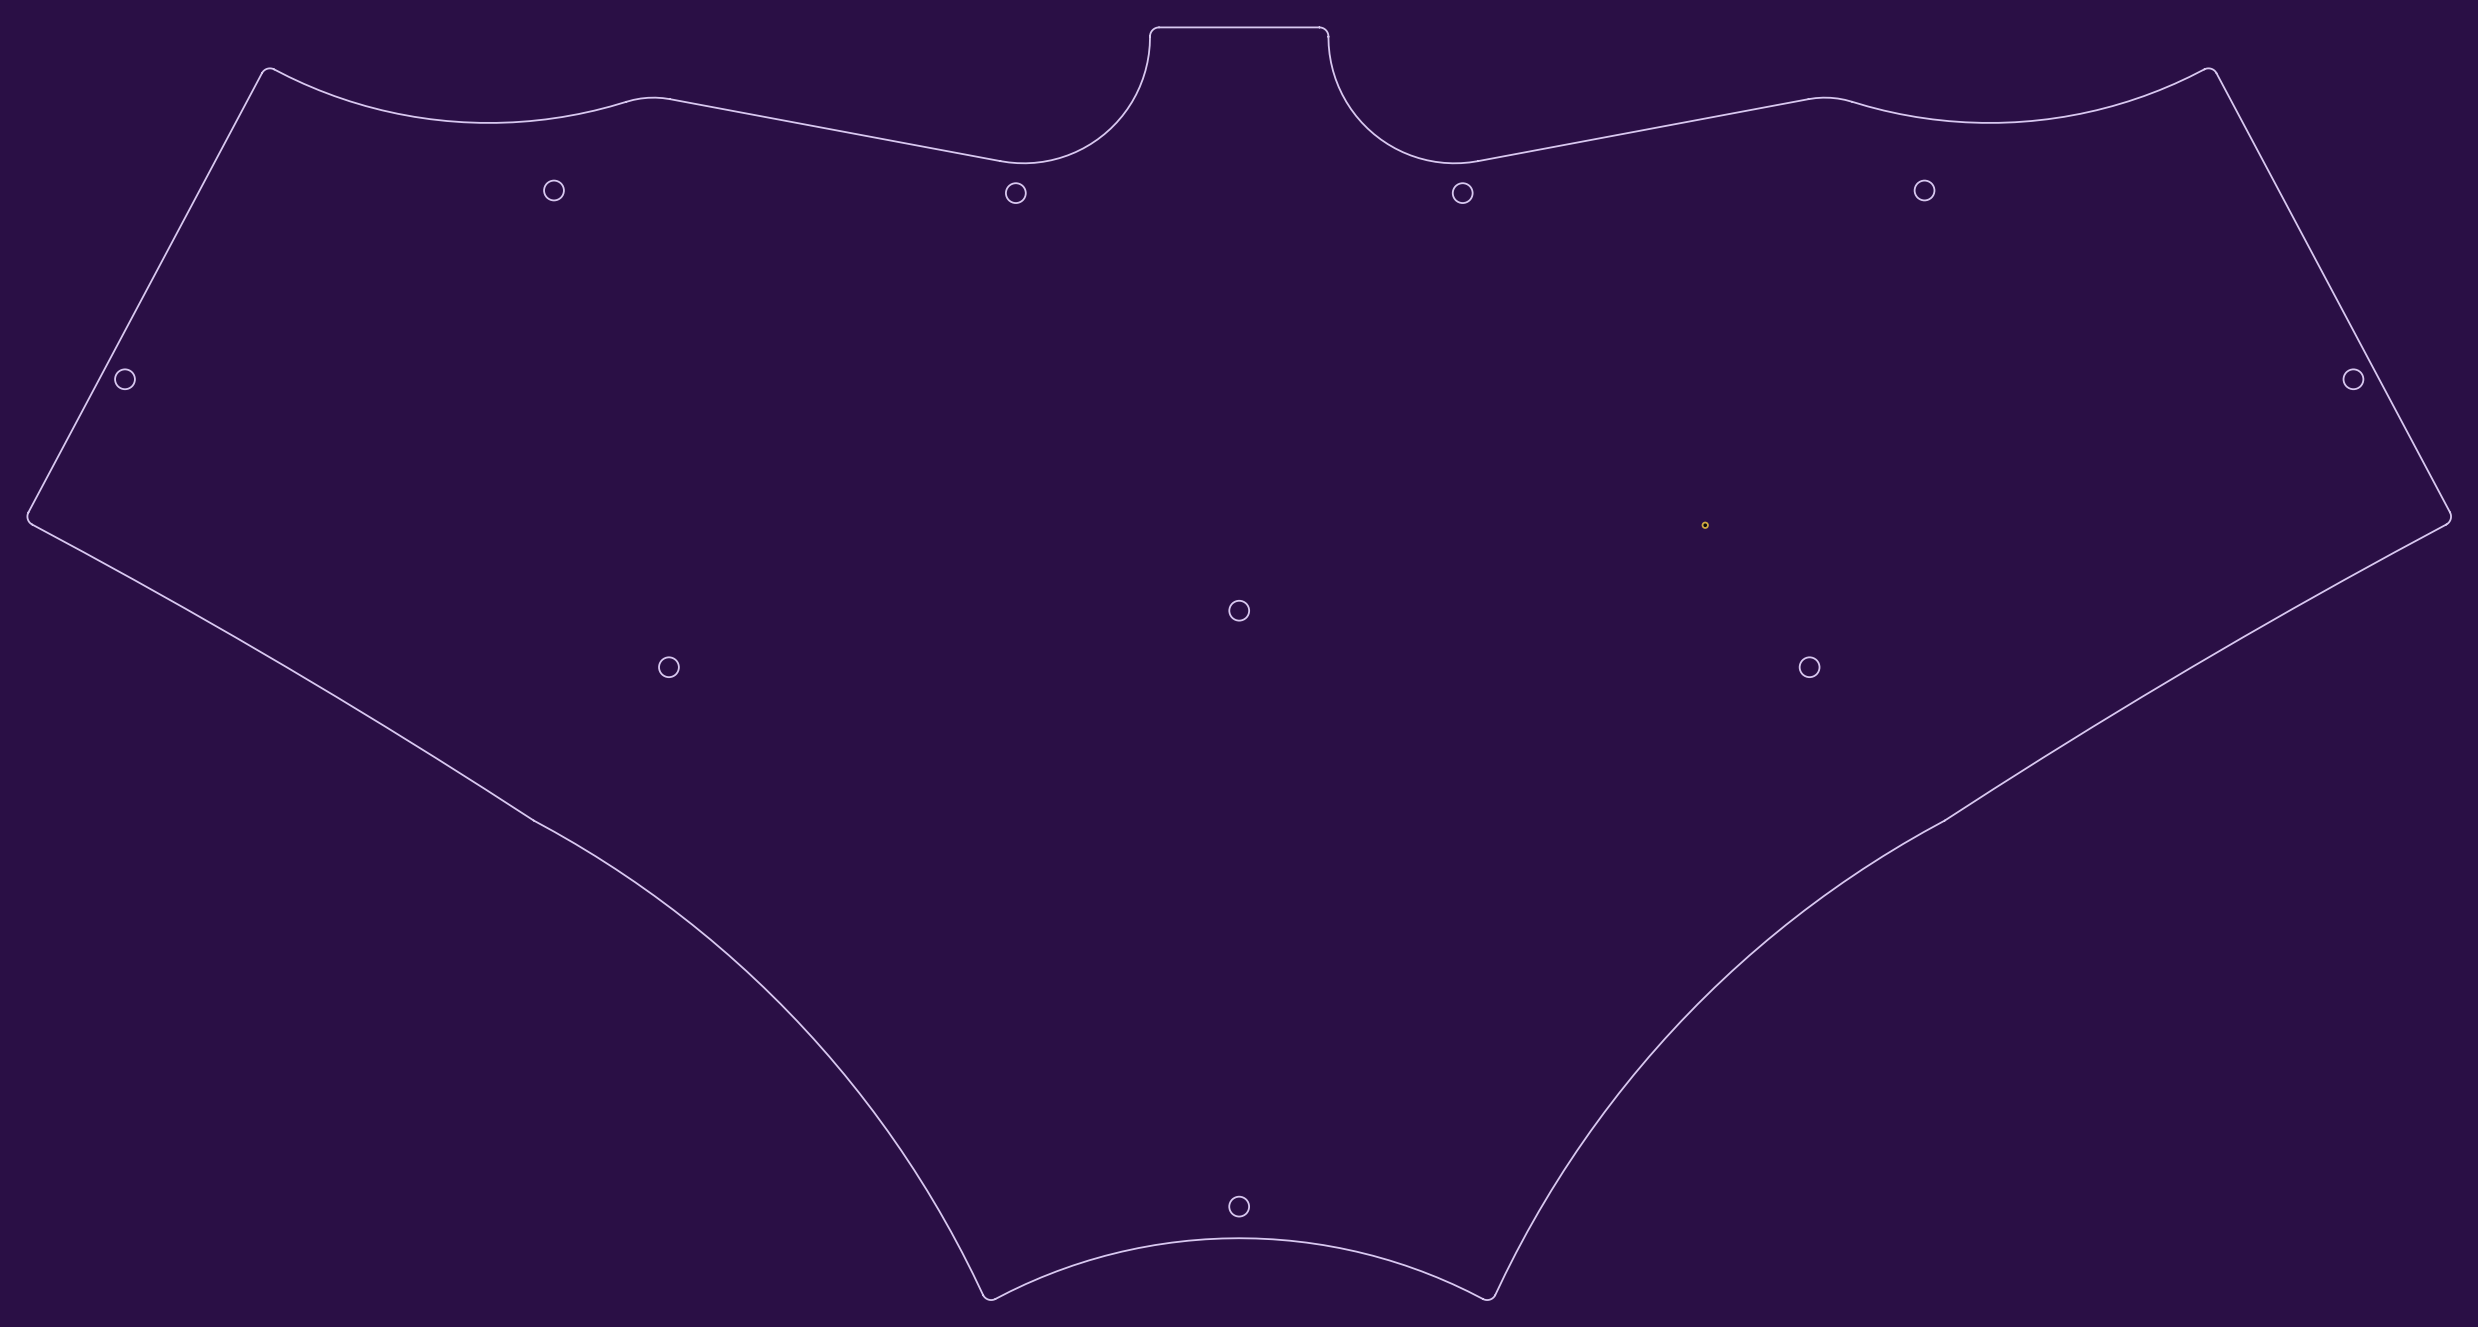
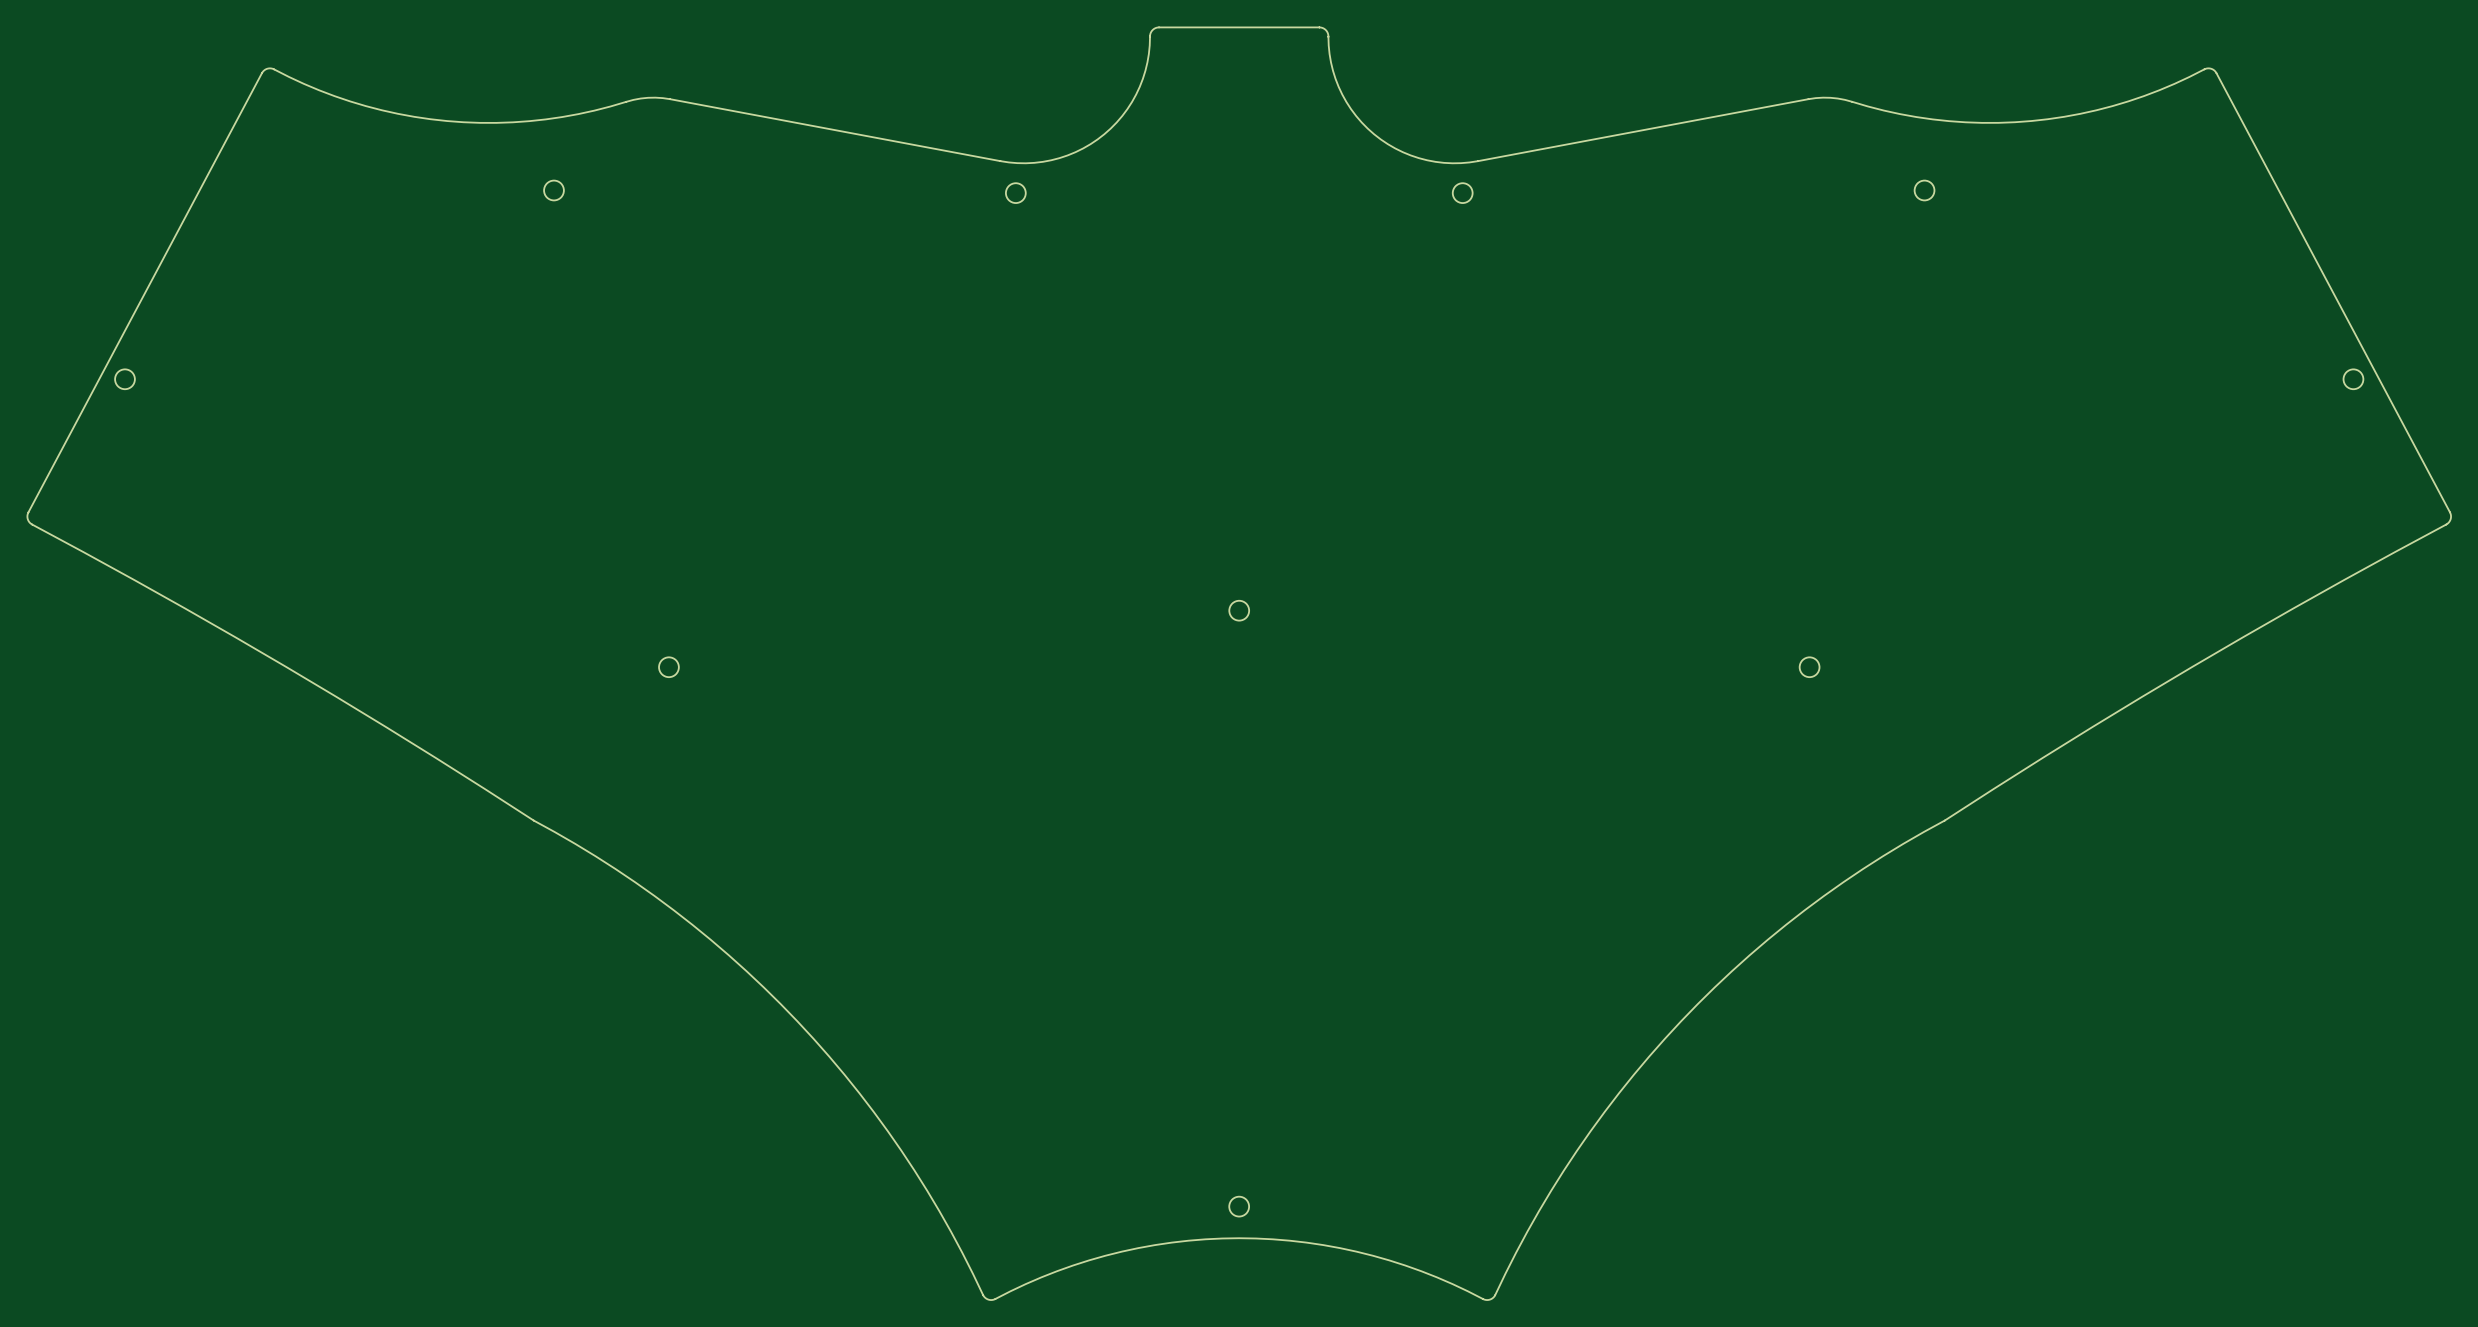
via: (1705, 525) -> none

